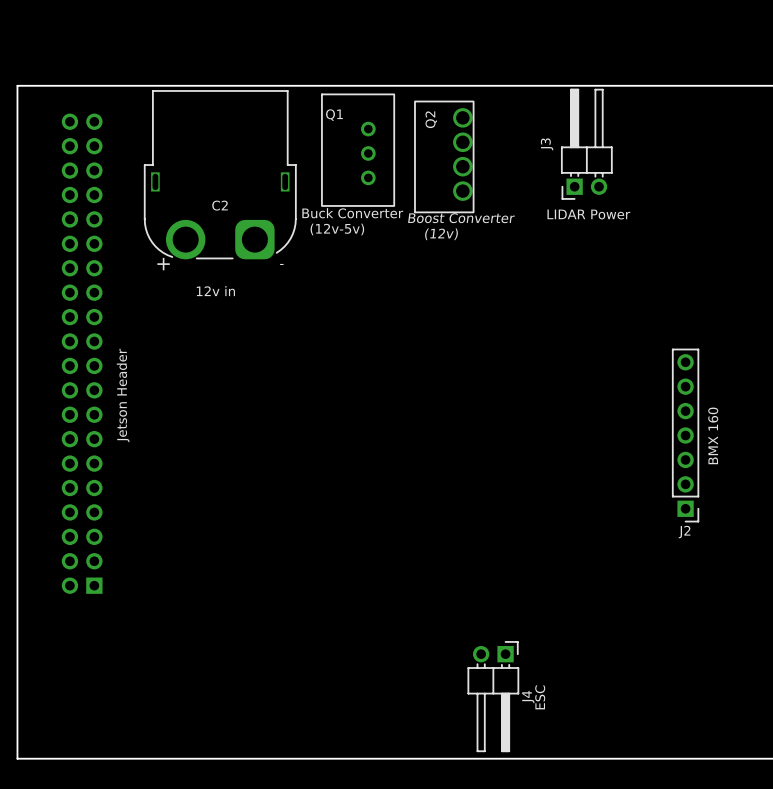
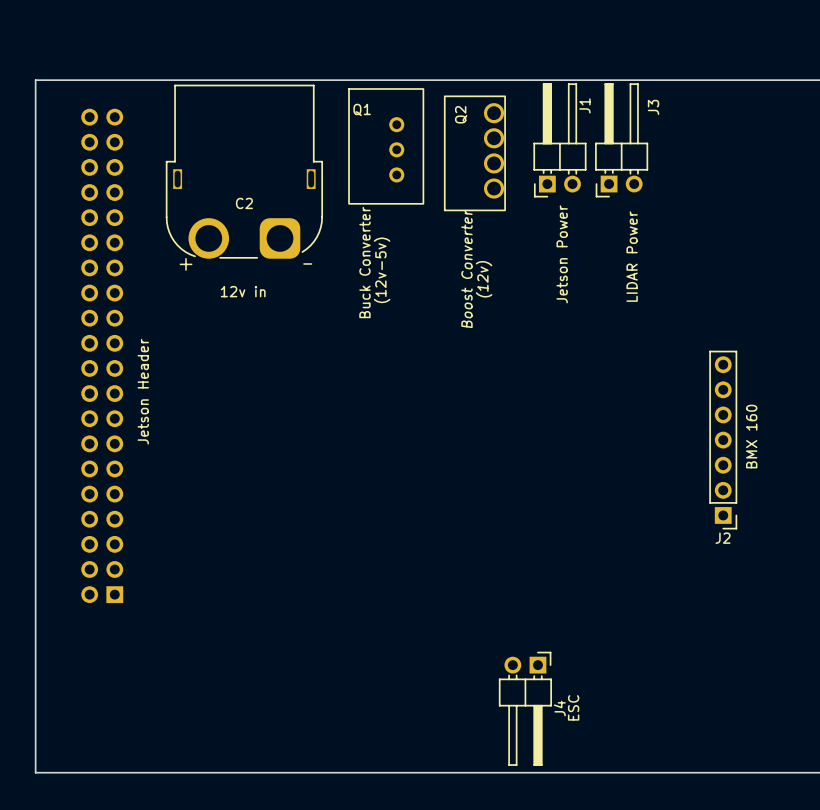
J1: none -> (559, 140)
J3 name position: J3 (547, 144) -> J3 (653, 107)
text rotation: 0° (352, 213) -> 90° counterclockwise (364, 262)
text rotation: 0° (588, 214) -> 90° counterclockwise (632, 256)
text rotation: 0° (461, 218) -> 90° counterclockwise (466, 268)
text rotation: 0° (337, 229) -> 90° counterclockwise (382, 270)
text rotation: 0° (441, 234) -> 90° counterclockwise (484, 279)
text: none -> Jetson Power (562, 254)

